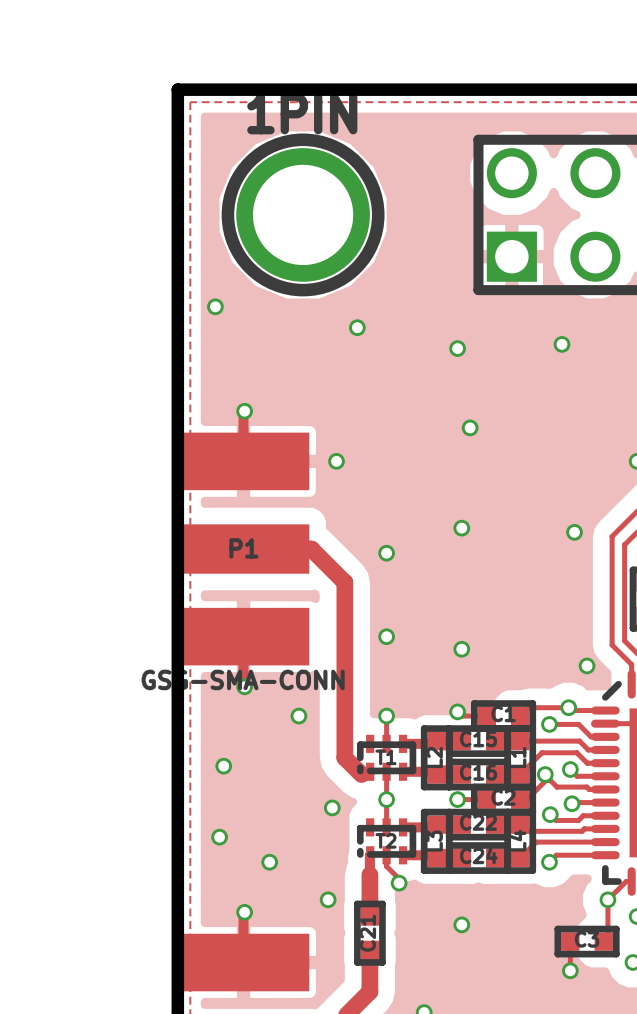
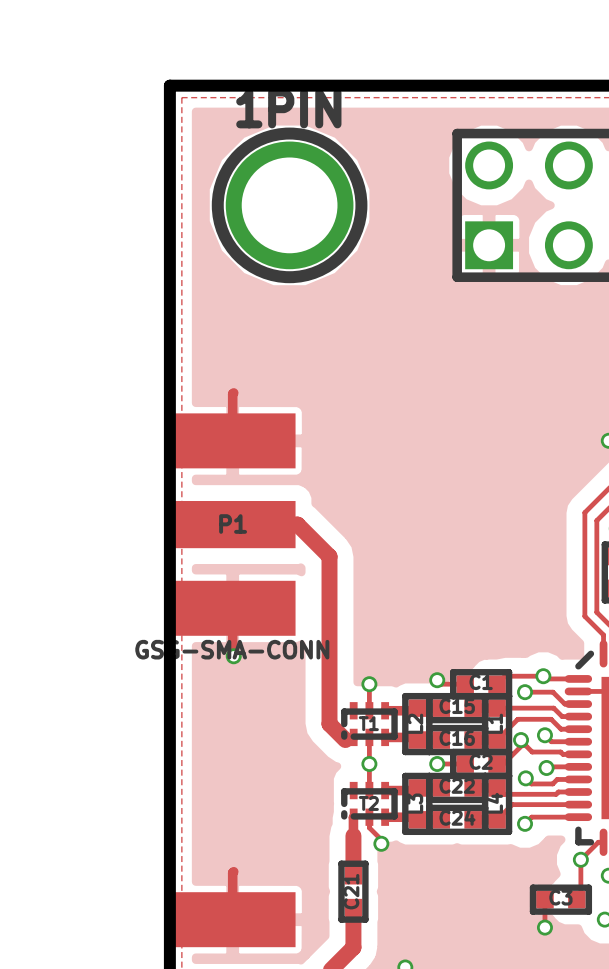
via: (215, 306) -> none
via: (357, 327) -> none
via: (562, 344) -> none
via: (457, 348) -> none
via: (244, 411) -> none
via: (470, 427) -> none
via: (336, 461) -> none
via: (461, 528) -> none
via: (574, 532) -> none
via: (386, 553) -> none
via: (386, 636) -> none
via: (461, 649) -> none
via: (587, 665) -> none
via: (298, 716) -> none
via: (223, 766) -> none
via: (332, 807) -> none
via: (219, 837) -> none
via: (269, 862) -> none
via: (328, 899) -> none
via: (244, 912) -> none
via: (461, 924) -> none

